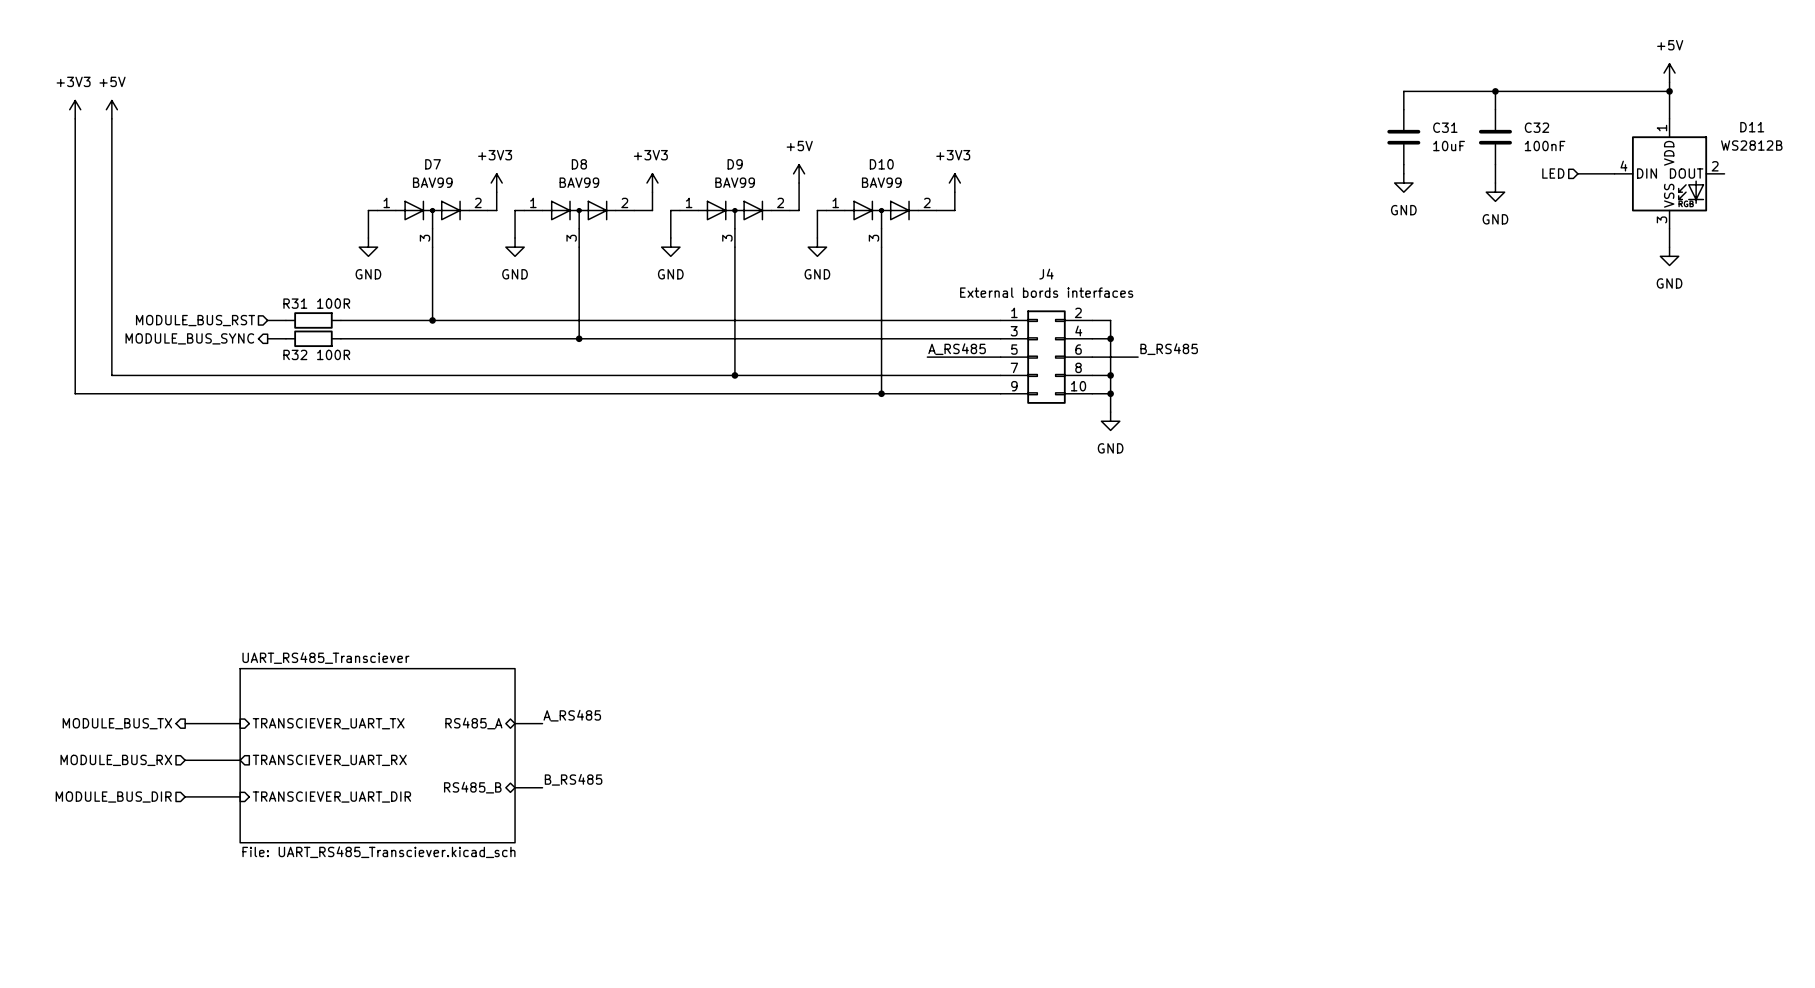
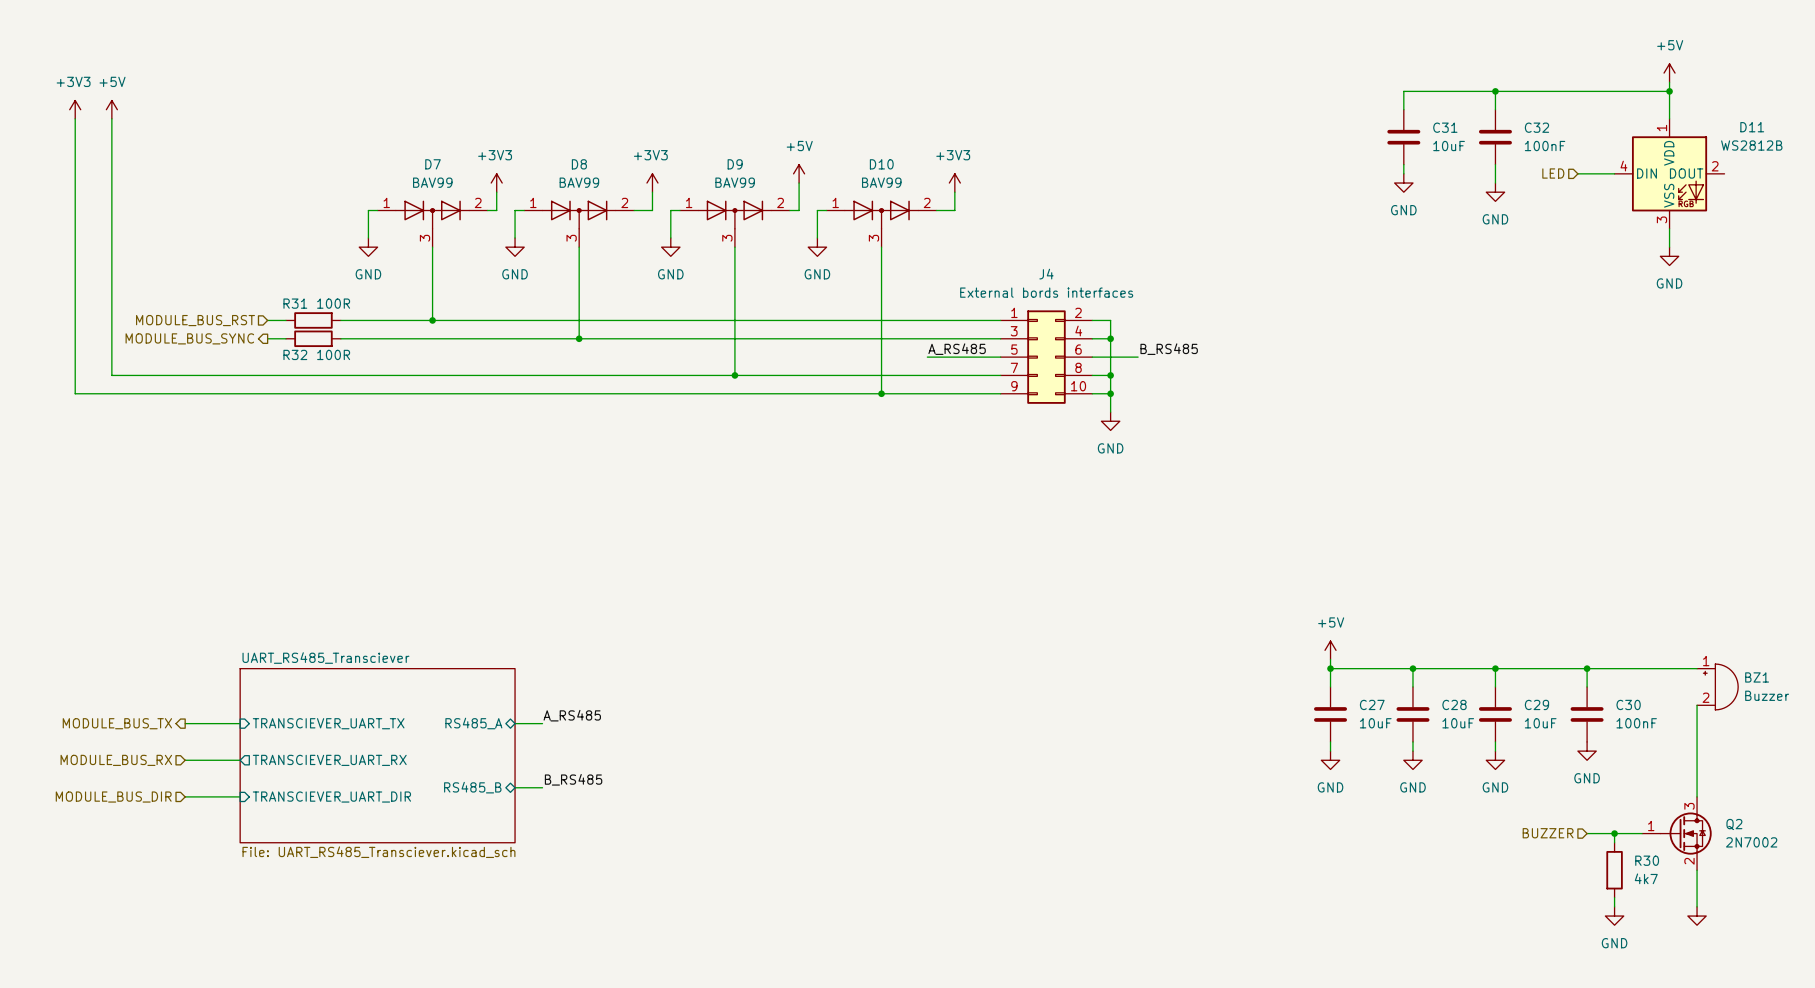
power symbol: none -> +5V (1330, 650)
wire: none -> (1330, 659) (1330, 686)
wire: none -> (1330, 668) (1697, 668)
junction: none -> (1330, 668)
wire: none -> (1412, 668) (1412, 686)
junction: none -> (1412, 668)
wire: none -> (1495, 668) (1495, 686)
junction: none -> (1495, 668)
wire: none -> (1587, 668) (1587, 686)
junction: none -> (1587, 668)
BZ1: none -> Buzzer (1717, 686)
wire: none -> (1697, 705) (1697, 796)
C27: none -> 10uF (1330, 714)
C28: none -> 10uF (1412, 714)
C29: none -> 10uF (1495, 714)
C30: none -> 100nF (1587, 714)
wire: none -> (1330, 741) (1330, 751)
wire: none -> (1412, 741) (1412, 751)
wire: none -> (1495, 741) (1495, 751)
power symbol: none -> GND (1587, 751)
power symbol: none -> GND (1330, 760)
power symbol: none -> GND (1412, 760)
power symbol: none -> GND (1495, 760)
hierarchical label: none -> BUZZER (1548, 833)
wire: none -> (1587, 833) (1642, 833)
wire: none -> (1614, 833) (1614, 842)
junction: none -> (1614, 833)
Q2: none -> 2N7002 (1676, 833)
R30: none -> 4k7 (1614, 870)
wire: none -> (1697, 870) (1697, 906)
wire: none -> (1614, 897) (1614, 906)
power symbol: none -> GND (1614, 916)
power symbol: none -> (1697, 916)

